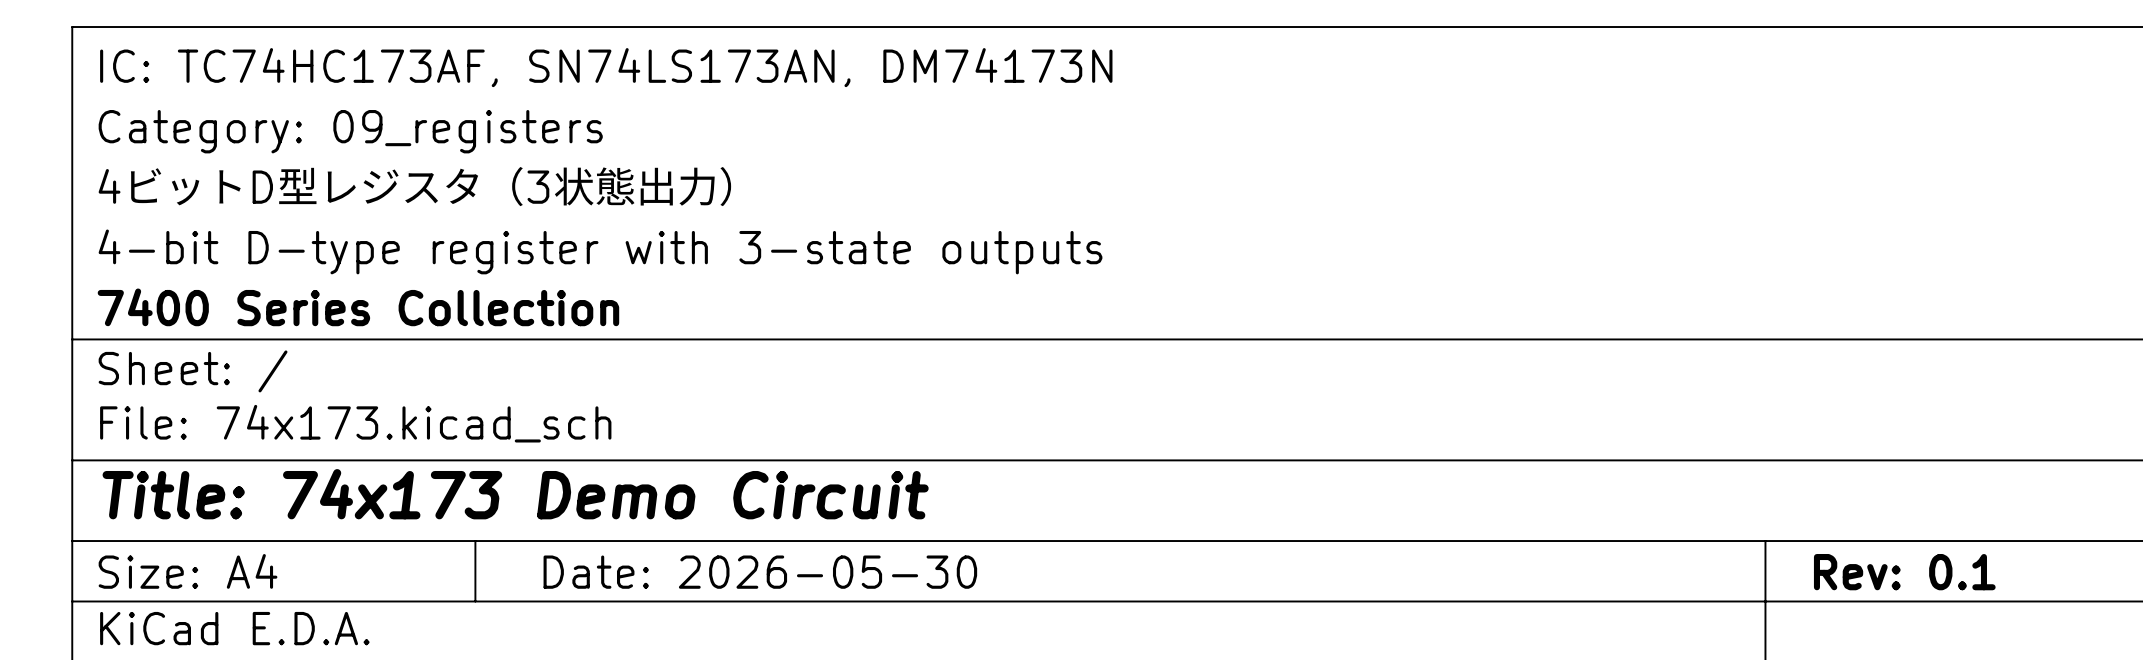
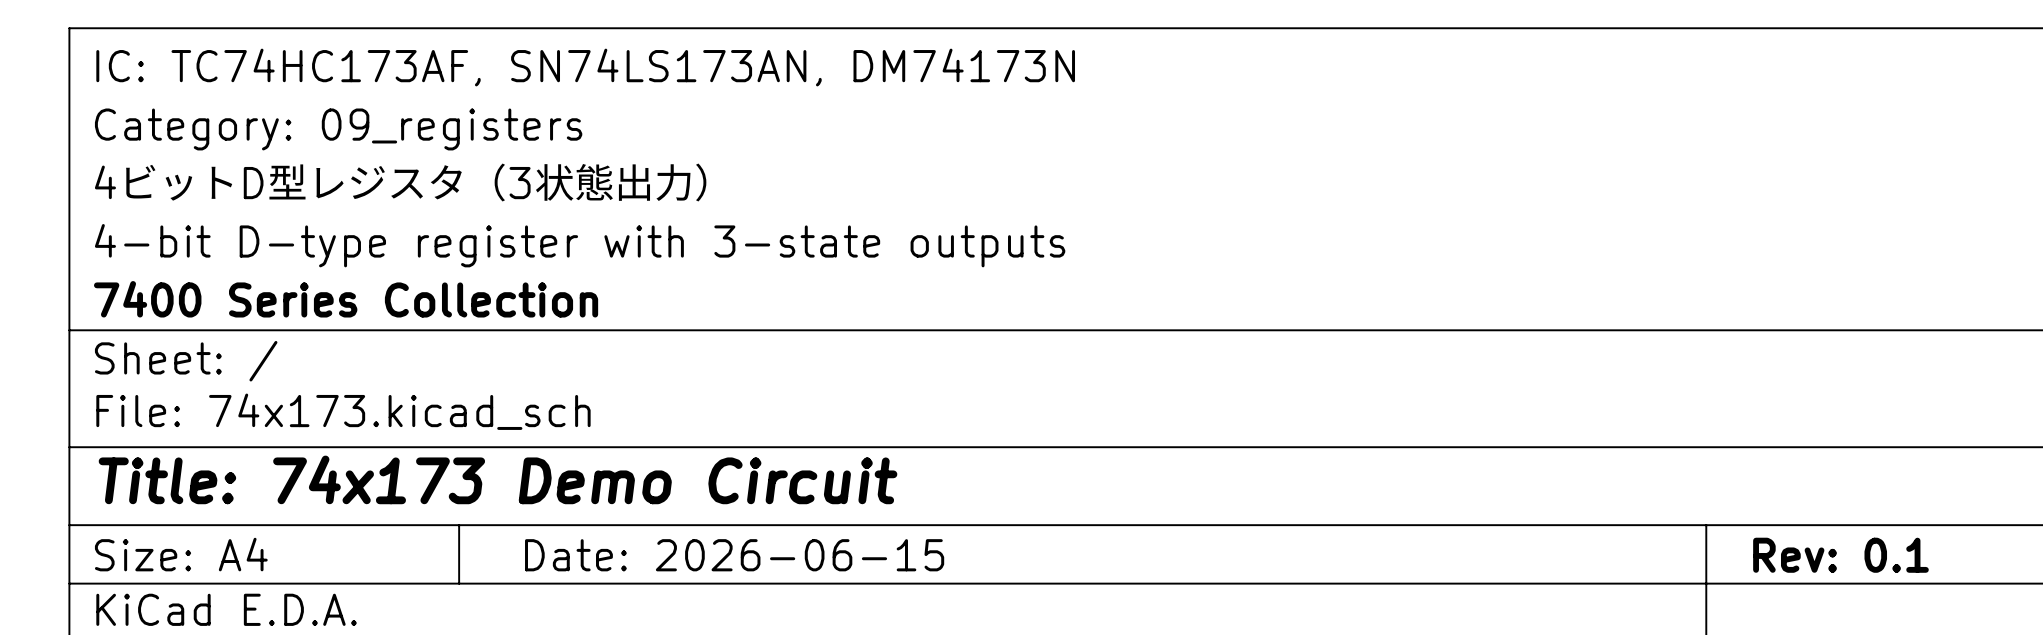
title block: Date: 2026-05-30 (760, 572) -> Date: 2026-06-15 (734, 555)

